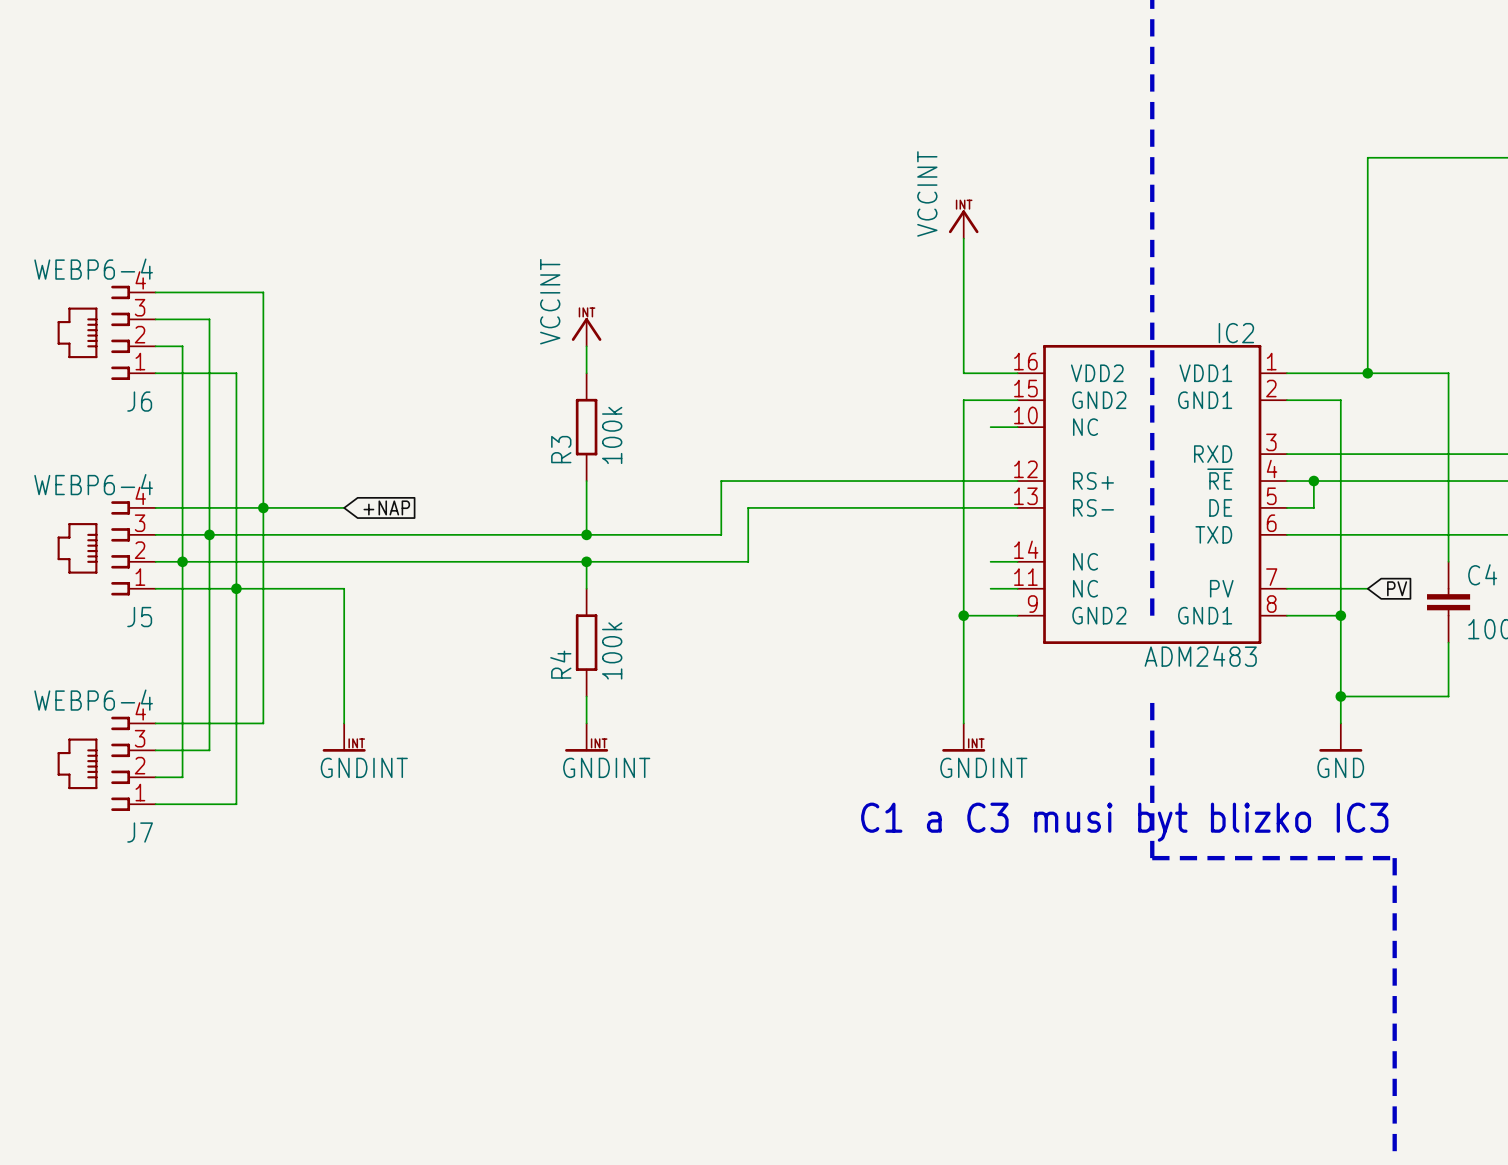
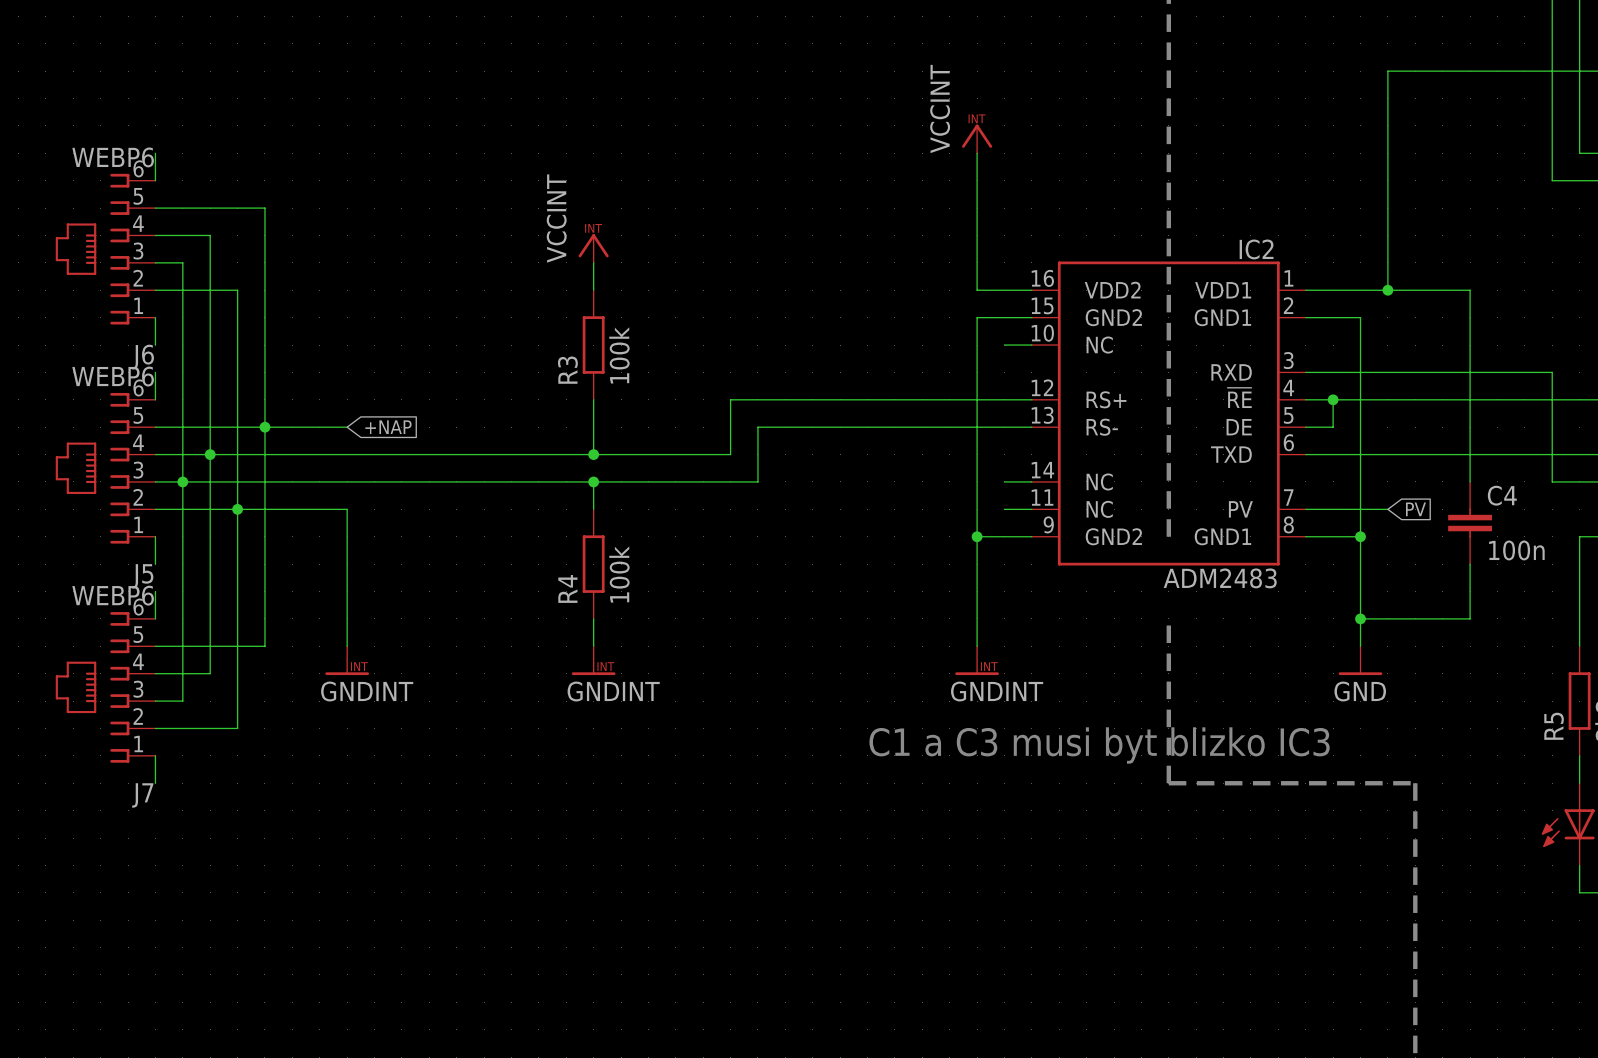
wire: none -> (155, 153) (155, 180)
J6 value: WEBP6-4 (93, 269) -> WEBP6 (113, 157)
J6 symbol: [57, 285, 156, 381] -> [55, 173, 156, 325]
wire: none -> (155, 317) (155, 345)
J6 name position: J6 (139, 401) -> J6 (143, 357)
wire: none -> (155, 372) (155, 399)
J5 value: WEBP6-4 (93, 484) -> WEBP6 (113, 376)
J5 symbol: [57, 501, 156, 596] -> [55, 392, 156, 544]
wire: none -> (155, 536) (155, 564)
J5 name position: J5 (139, 617) -> J5 (142, 576)
wire: none -> (155, 591) (155, 618)
J7 value: WEBP6-4 (93, 700) -> WEBP6 (113, 595)
J7 symbol: [57, 716, 156, 811] -> [55, 612, 156, 763]
wire: none -> (155, 755) (155, 783)
J7 name position: J7 (140, 832) -> J7 (142, 795)

